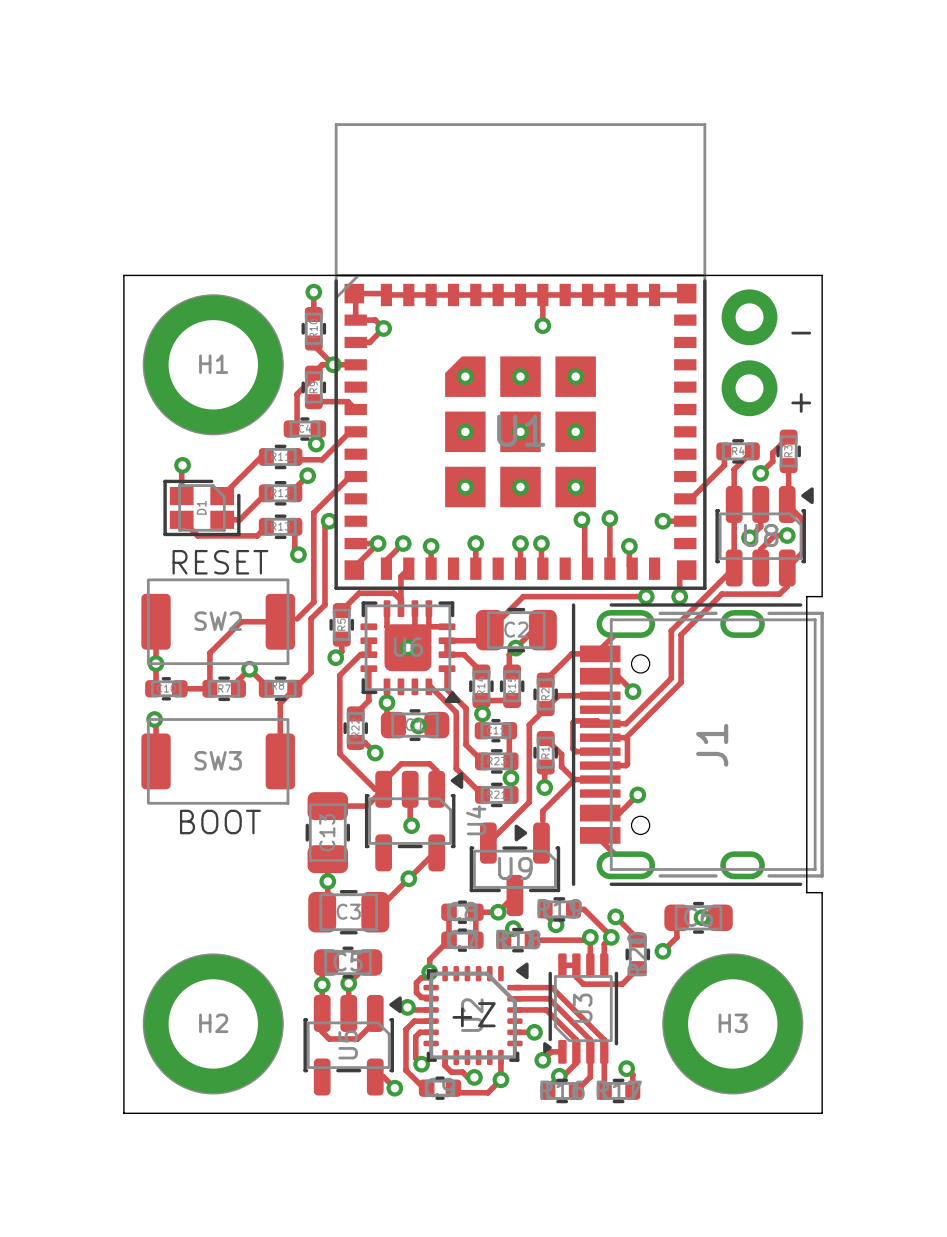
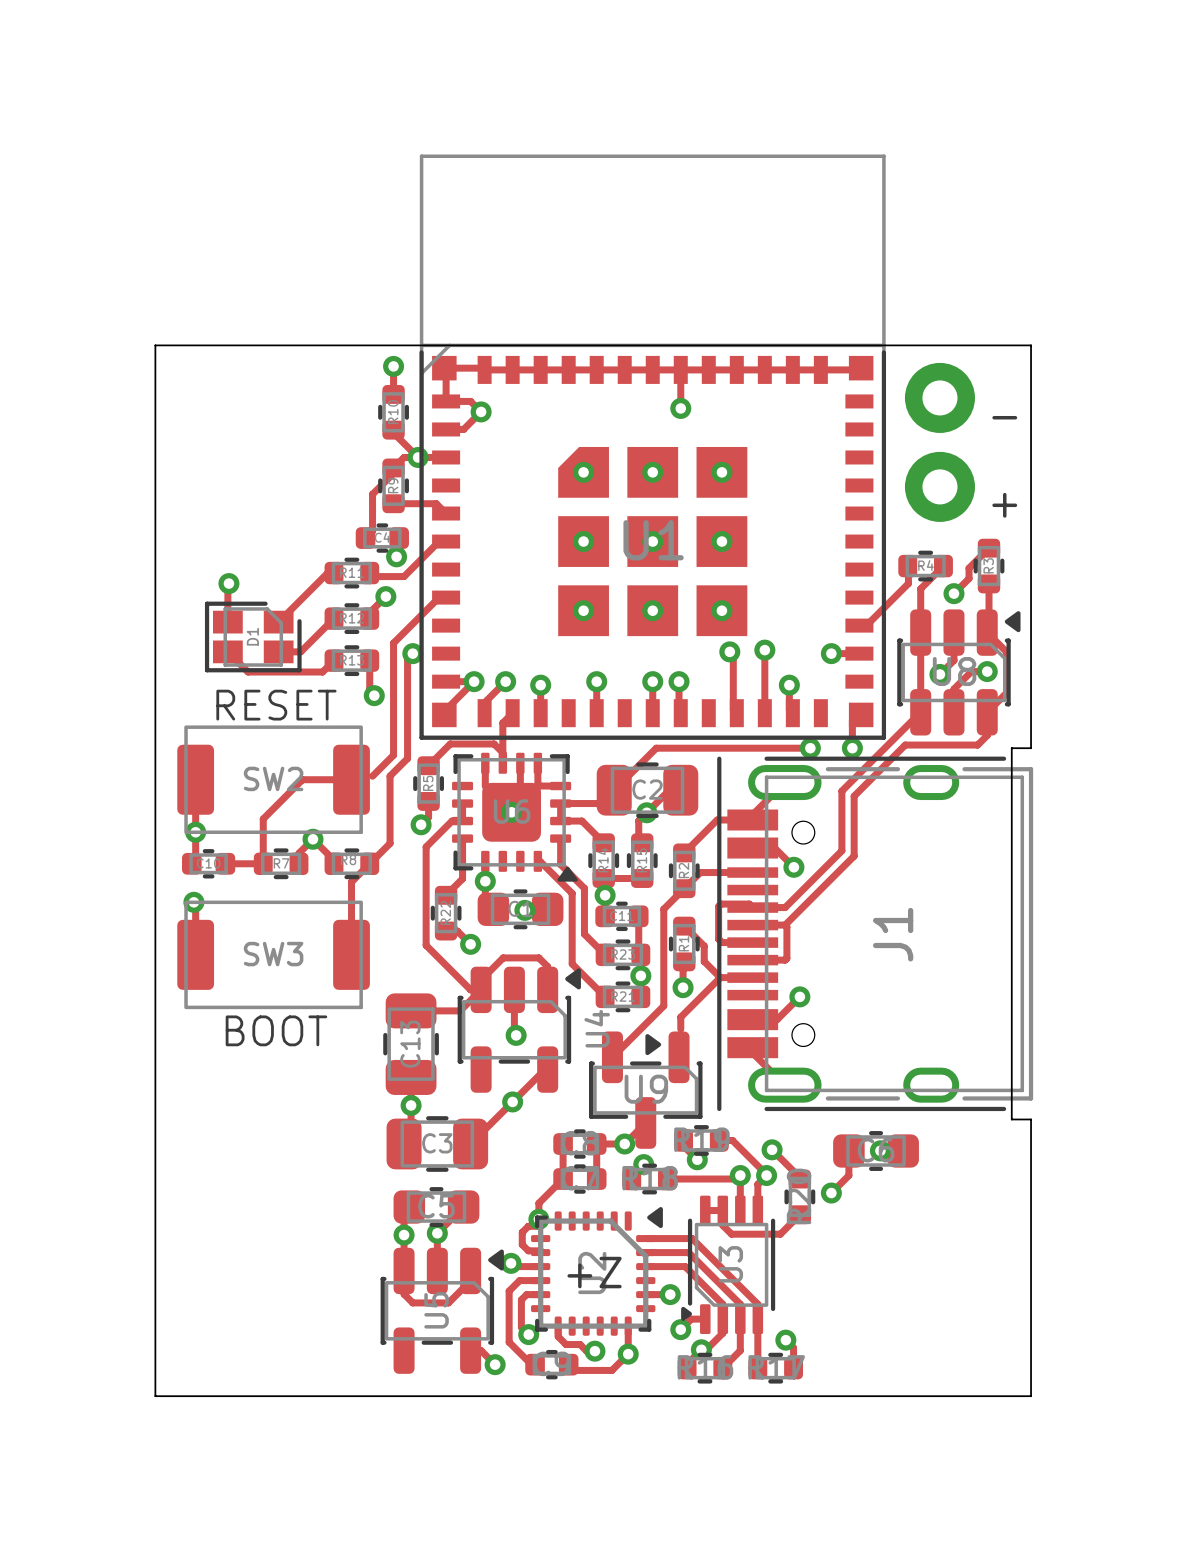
H1: (213, 364) -> none
H2: (213, 1023) -> none
H3: (732, 1023) -> none

